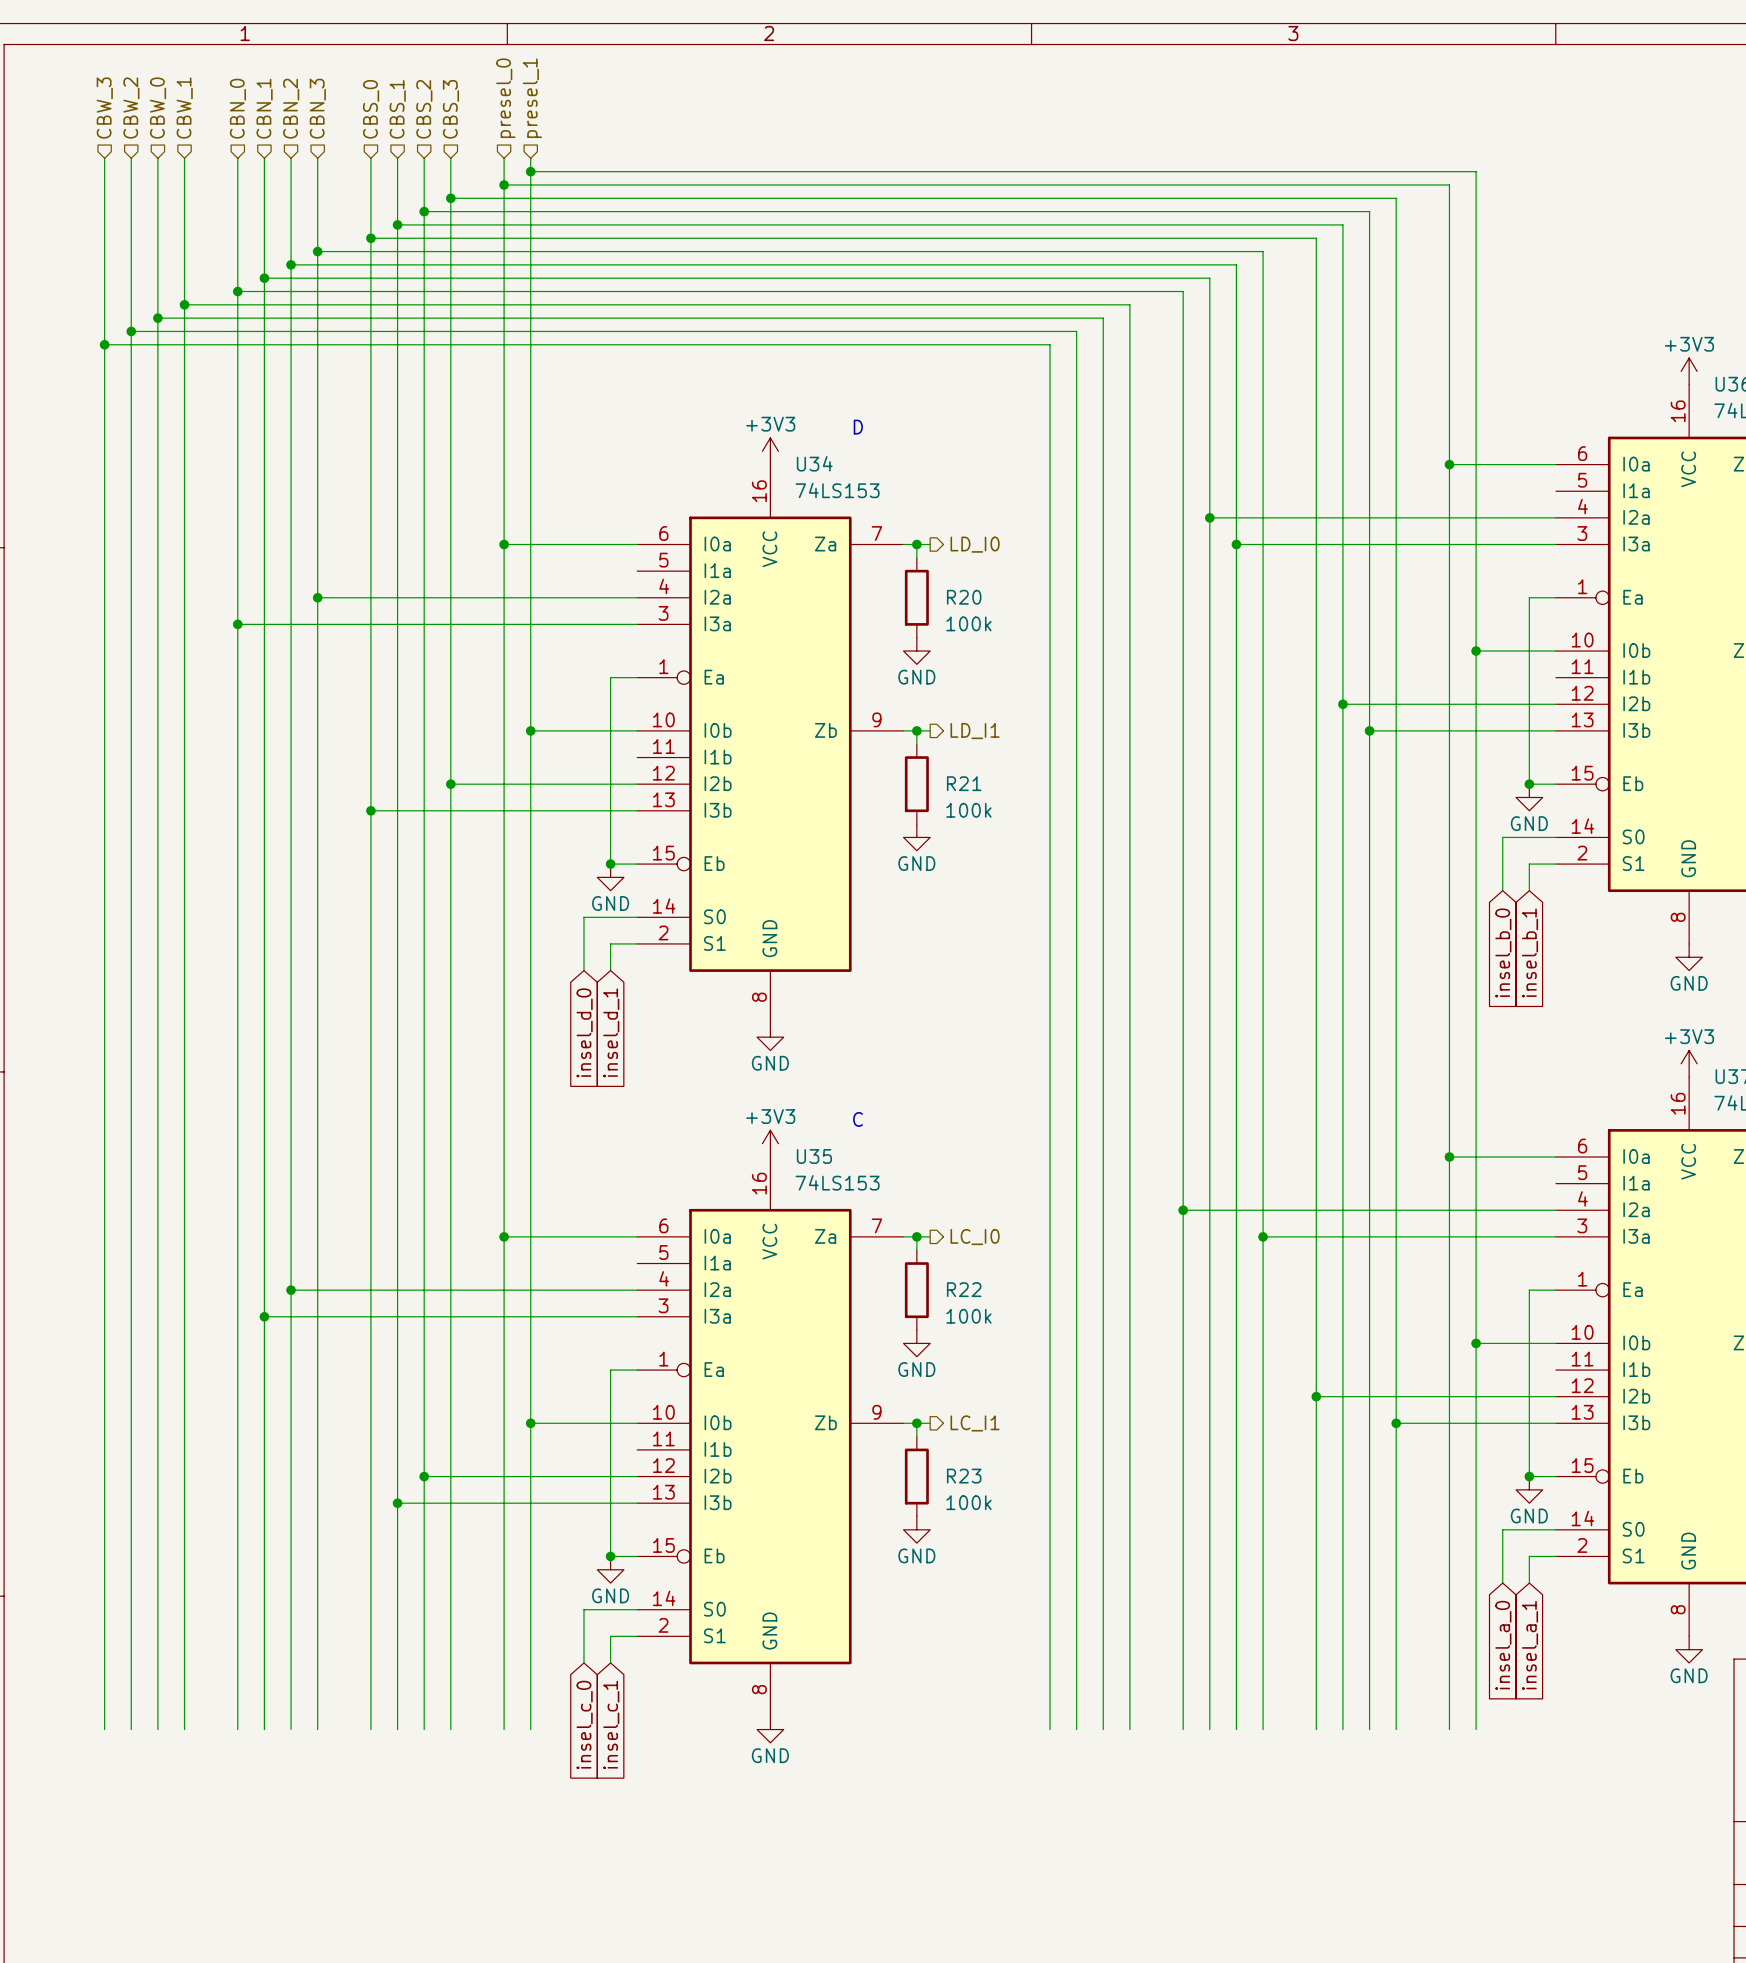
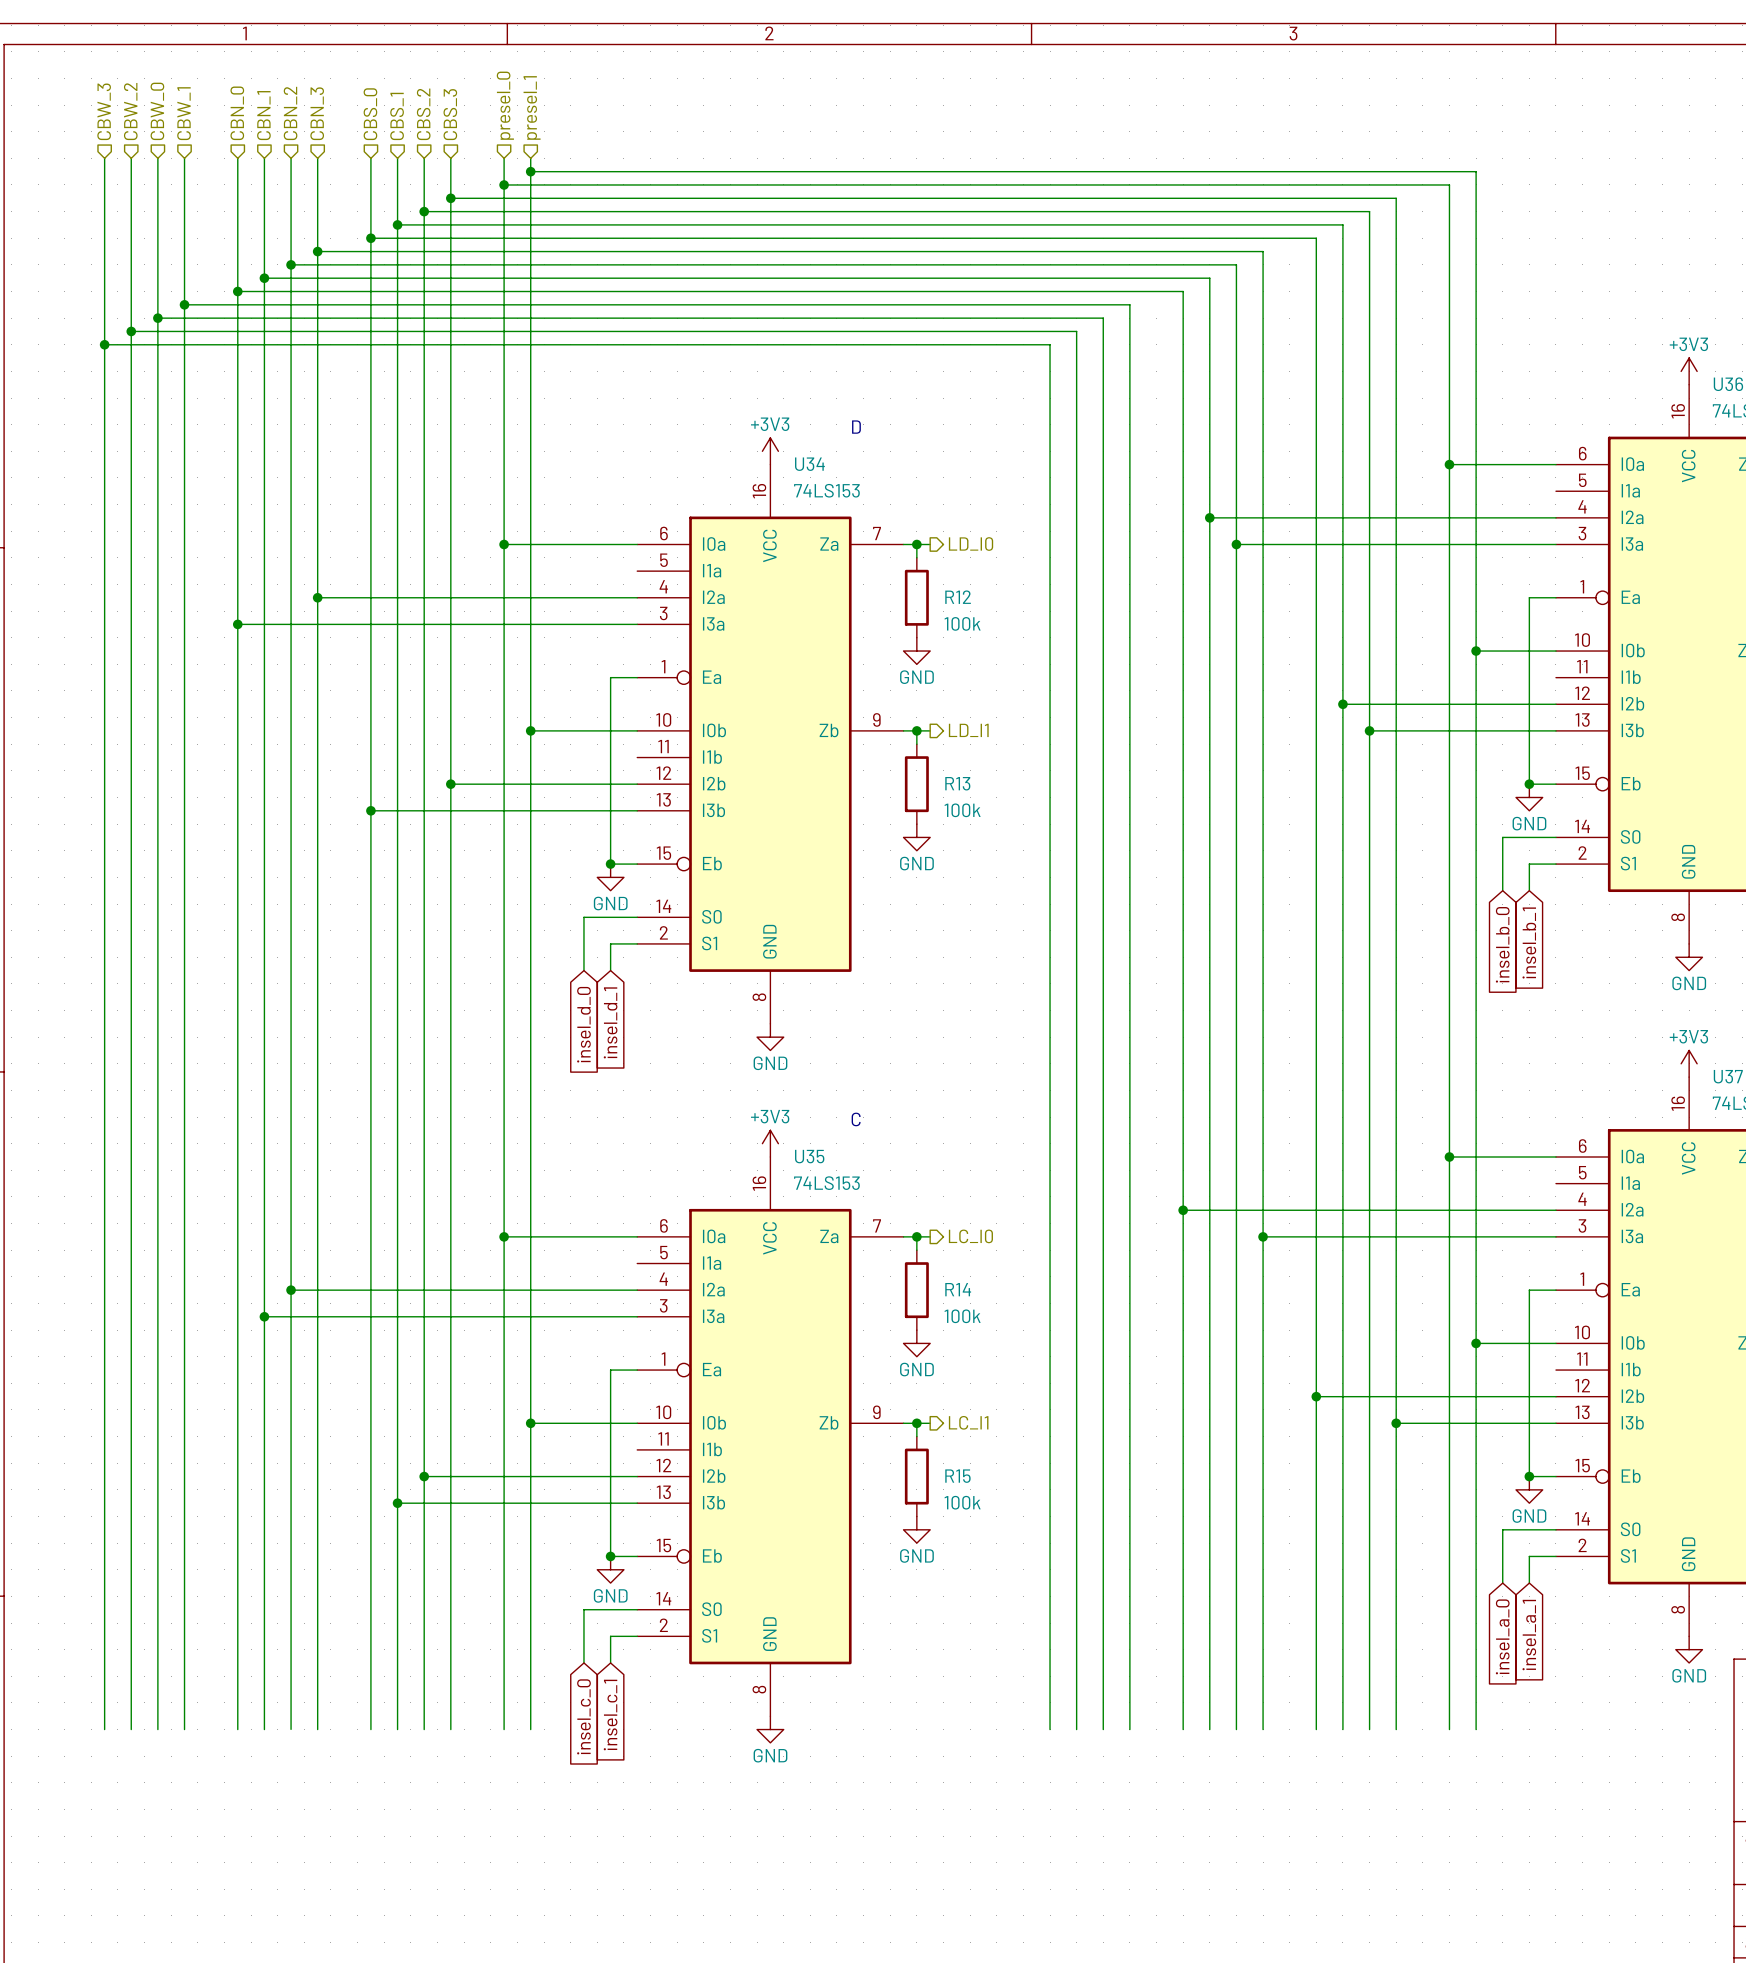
R20 name: R20 (964, 597) -> R12 (958, 597)
R21 name: R21 (964, 783) -> R13 (957, 783)
R22 name: R22 (964, 1289) -> R14 (958, 1289)
R23 name: R23 (964, 1476) -> R15 (957, 1476)

